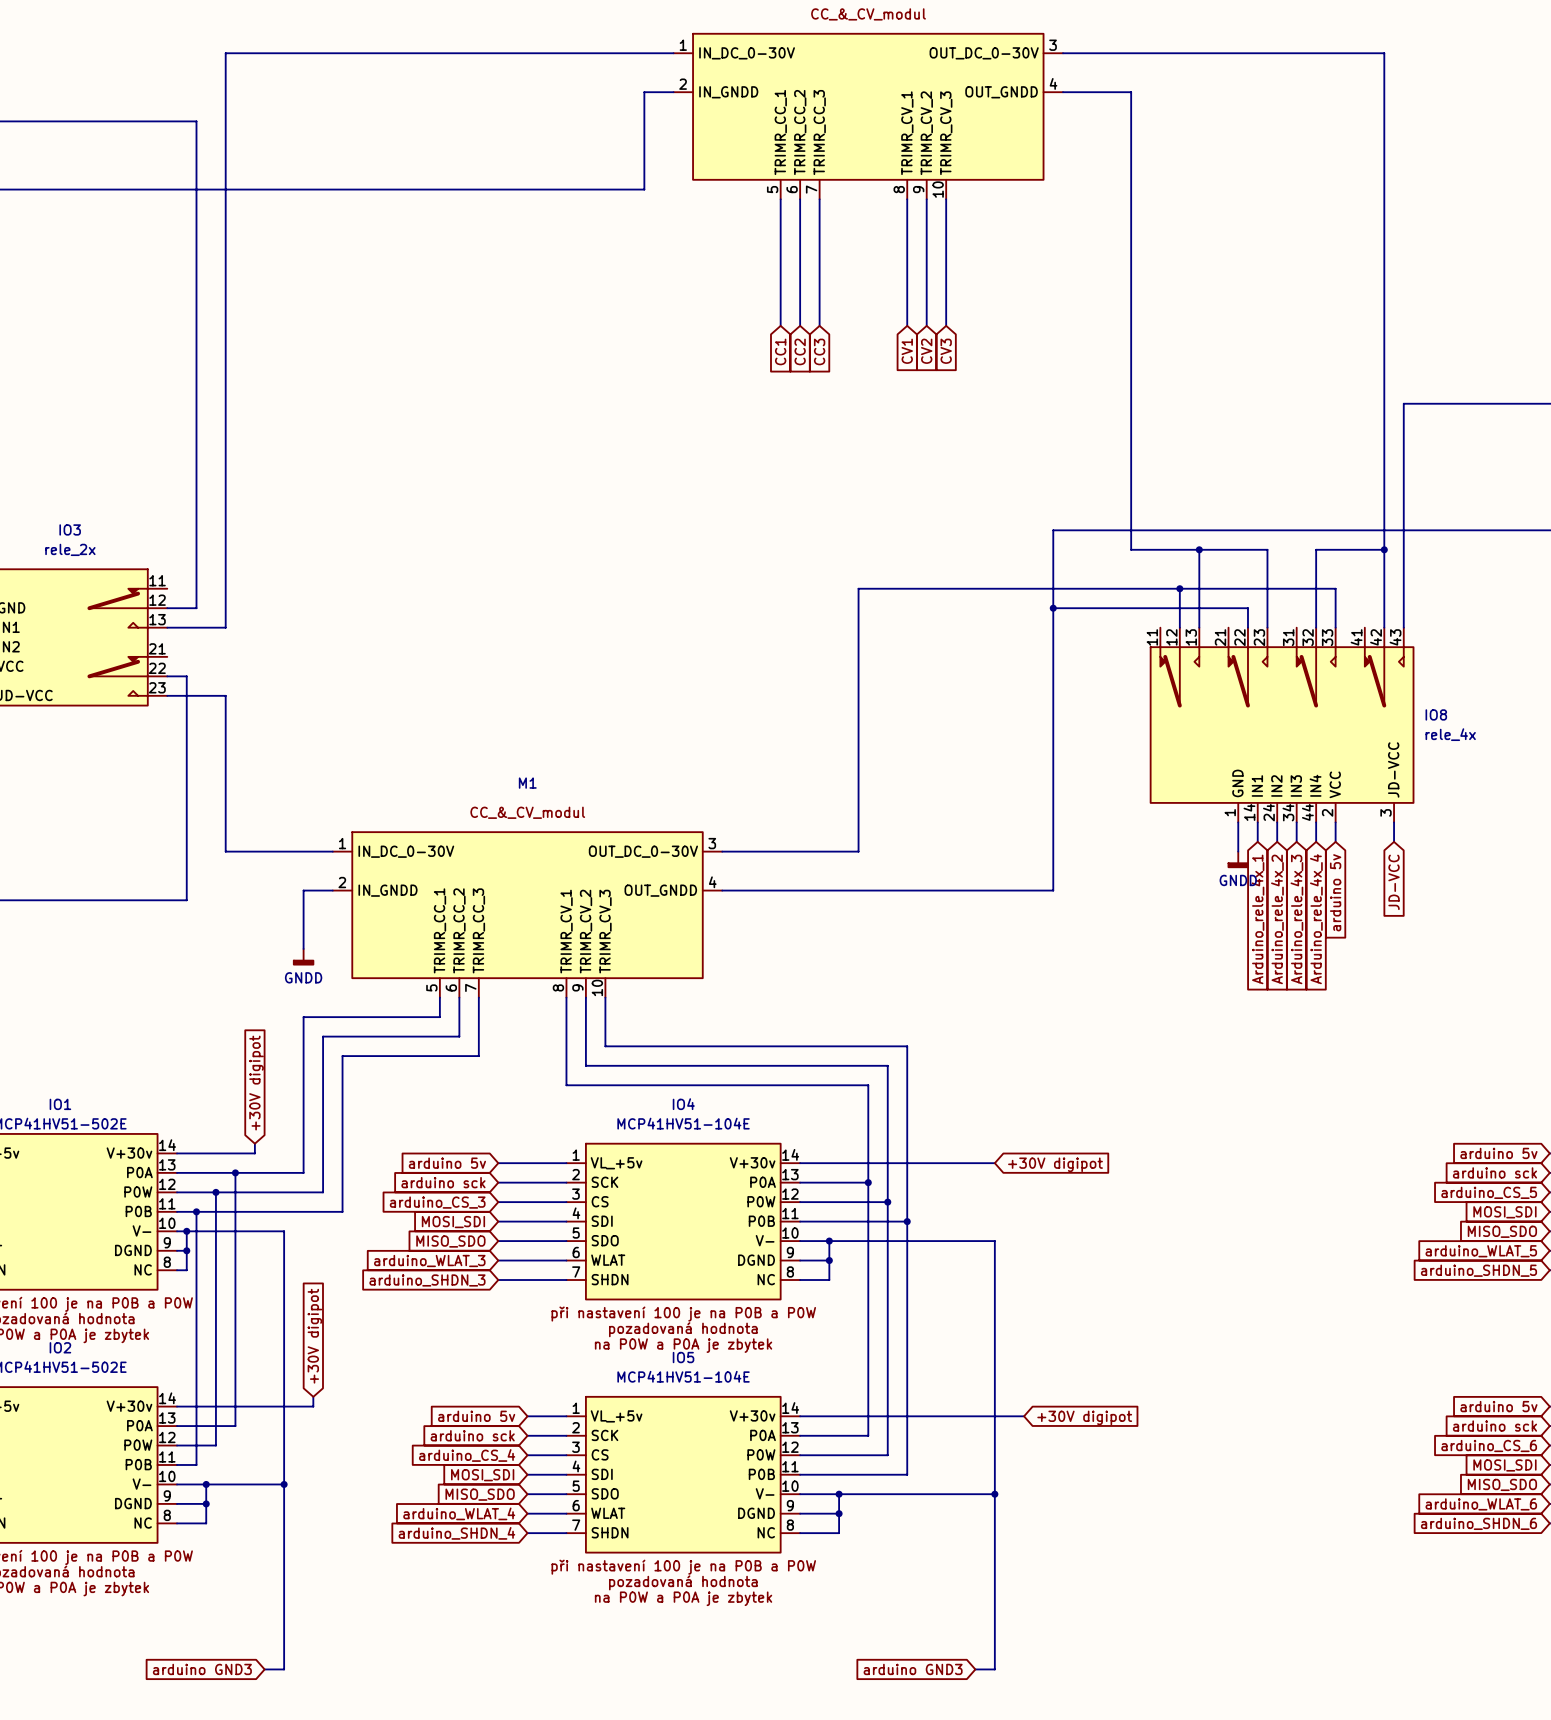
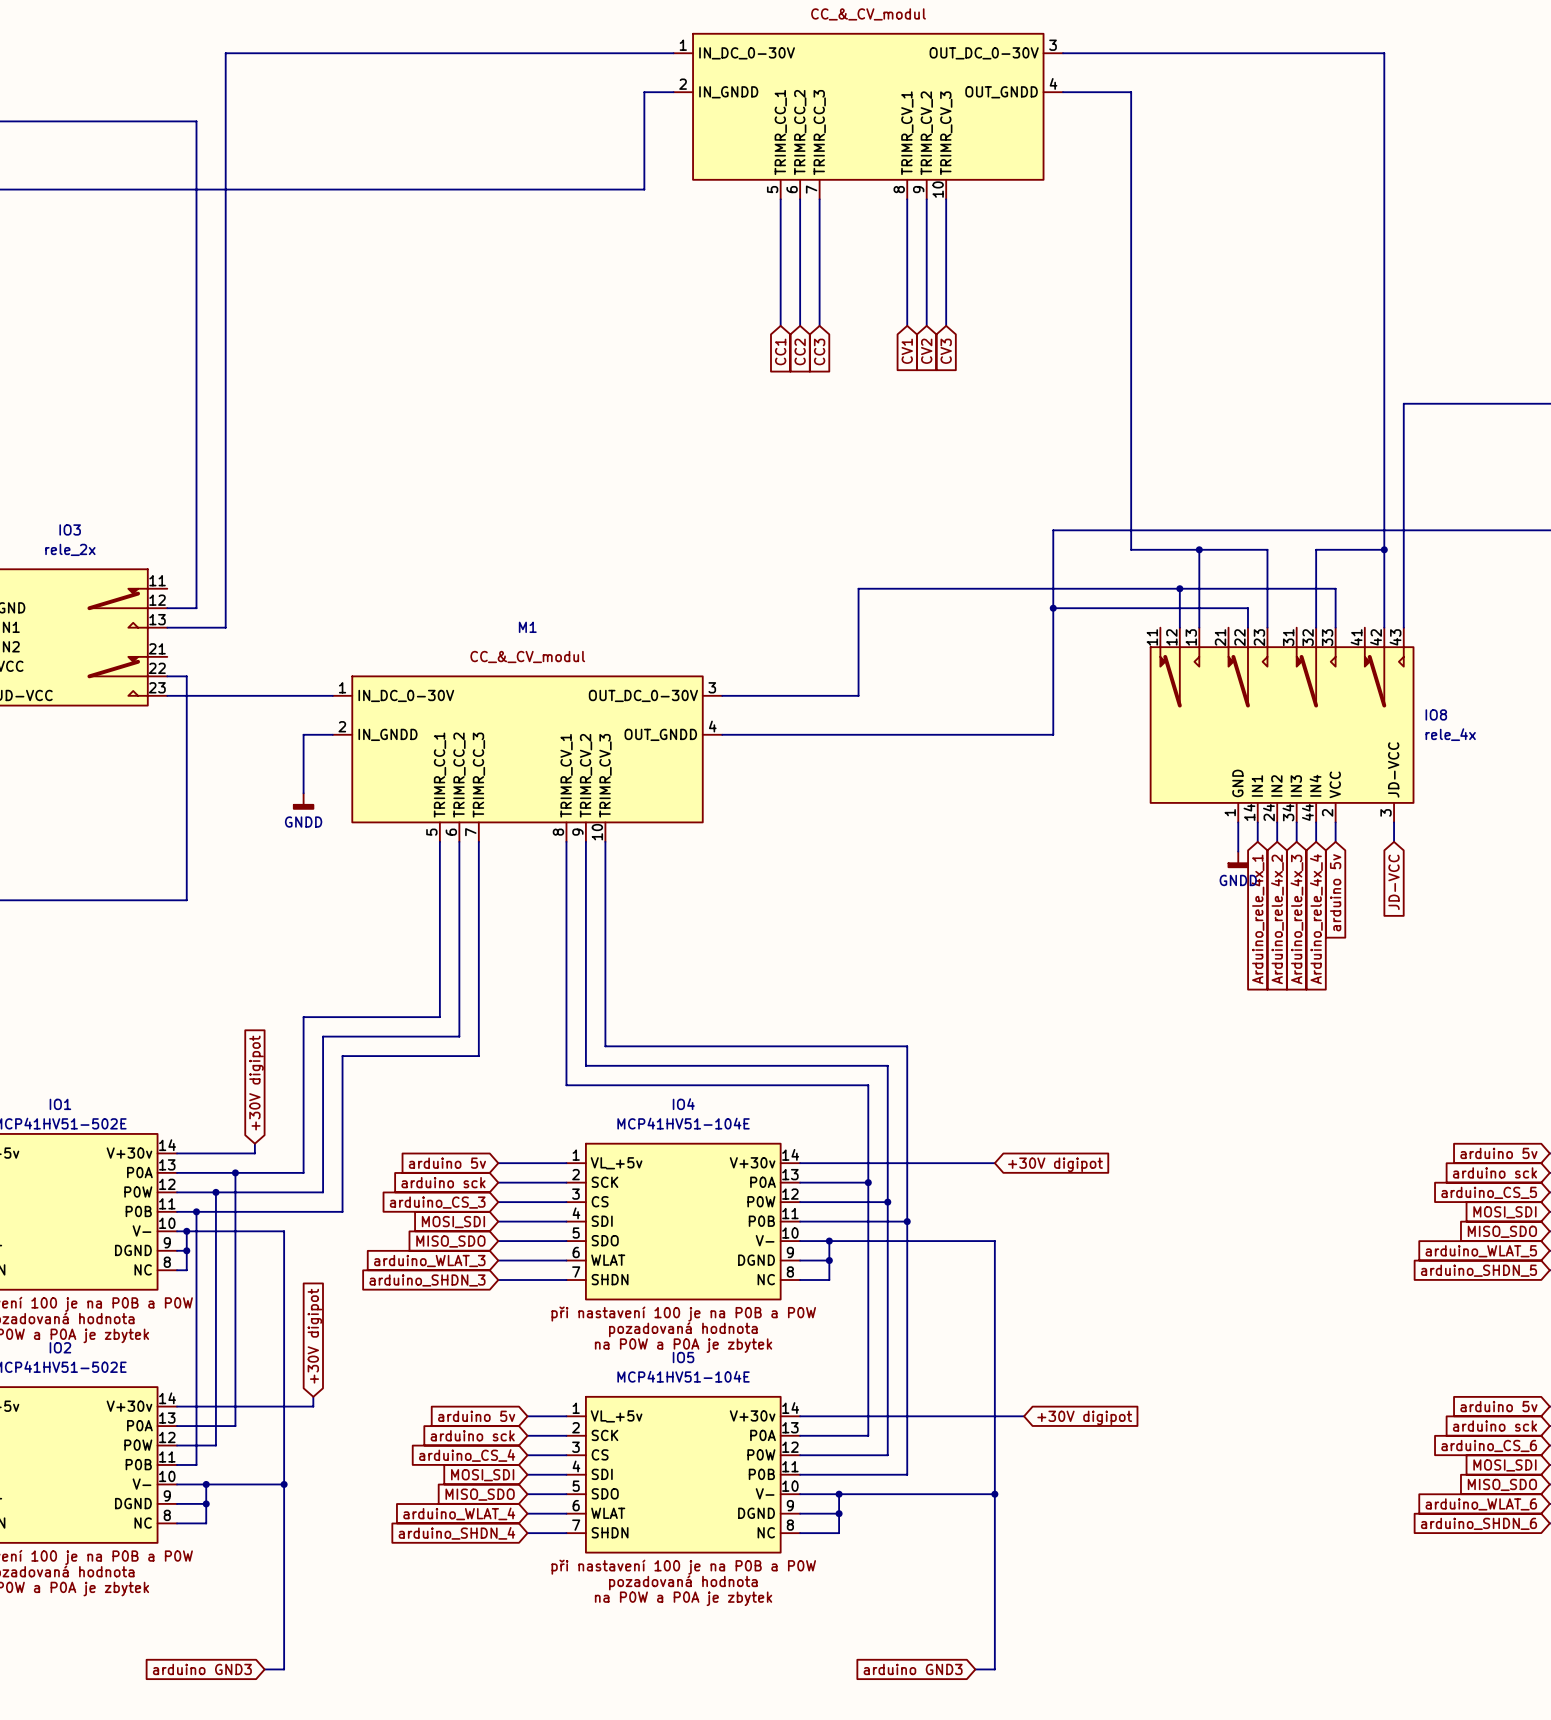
wire: (225, 695) (225, 851) (332, 851) -> (225, 695) (332, 695)
wire: (858, 695) (858, 851) (722, 851) -> (858, 695) (722, 695)
wire: (1053, 734) (1053, 890) (722, 890) -> (1053, 734) (722, 734)
wire: (332, 890) (303, 890) (303, 948) -> (332, 734) (303, 734) (303, 793)
M1 position: (527, 914) -> (527, 759)
power symbol position: GNDD (303, 957) -> GNDD (303, 801)

